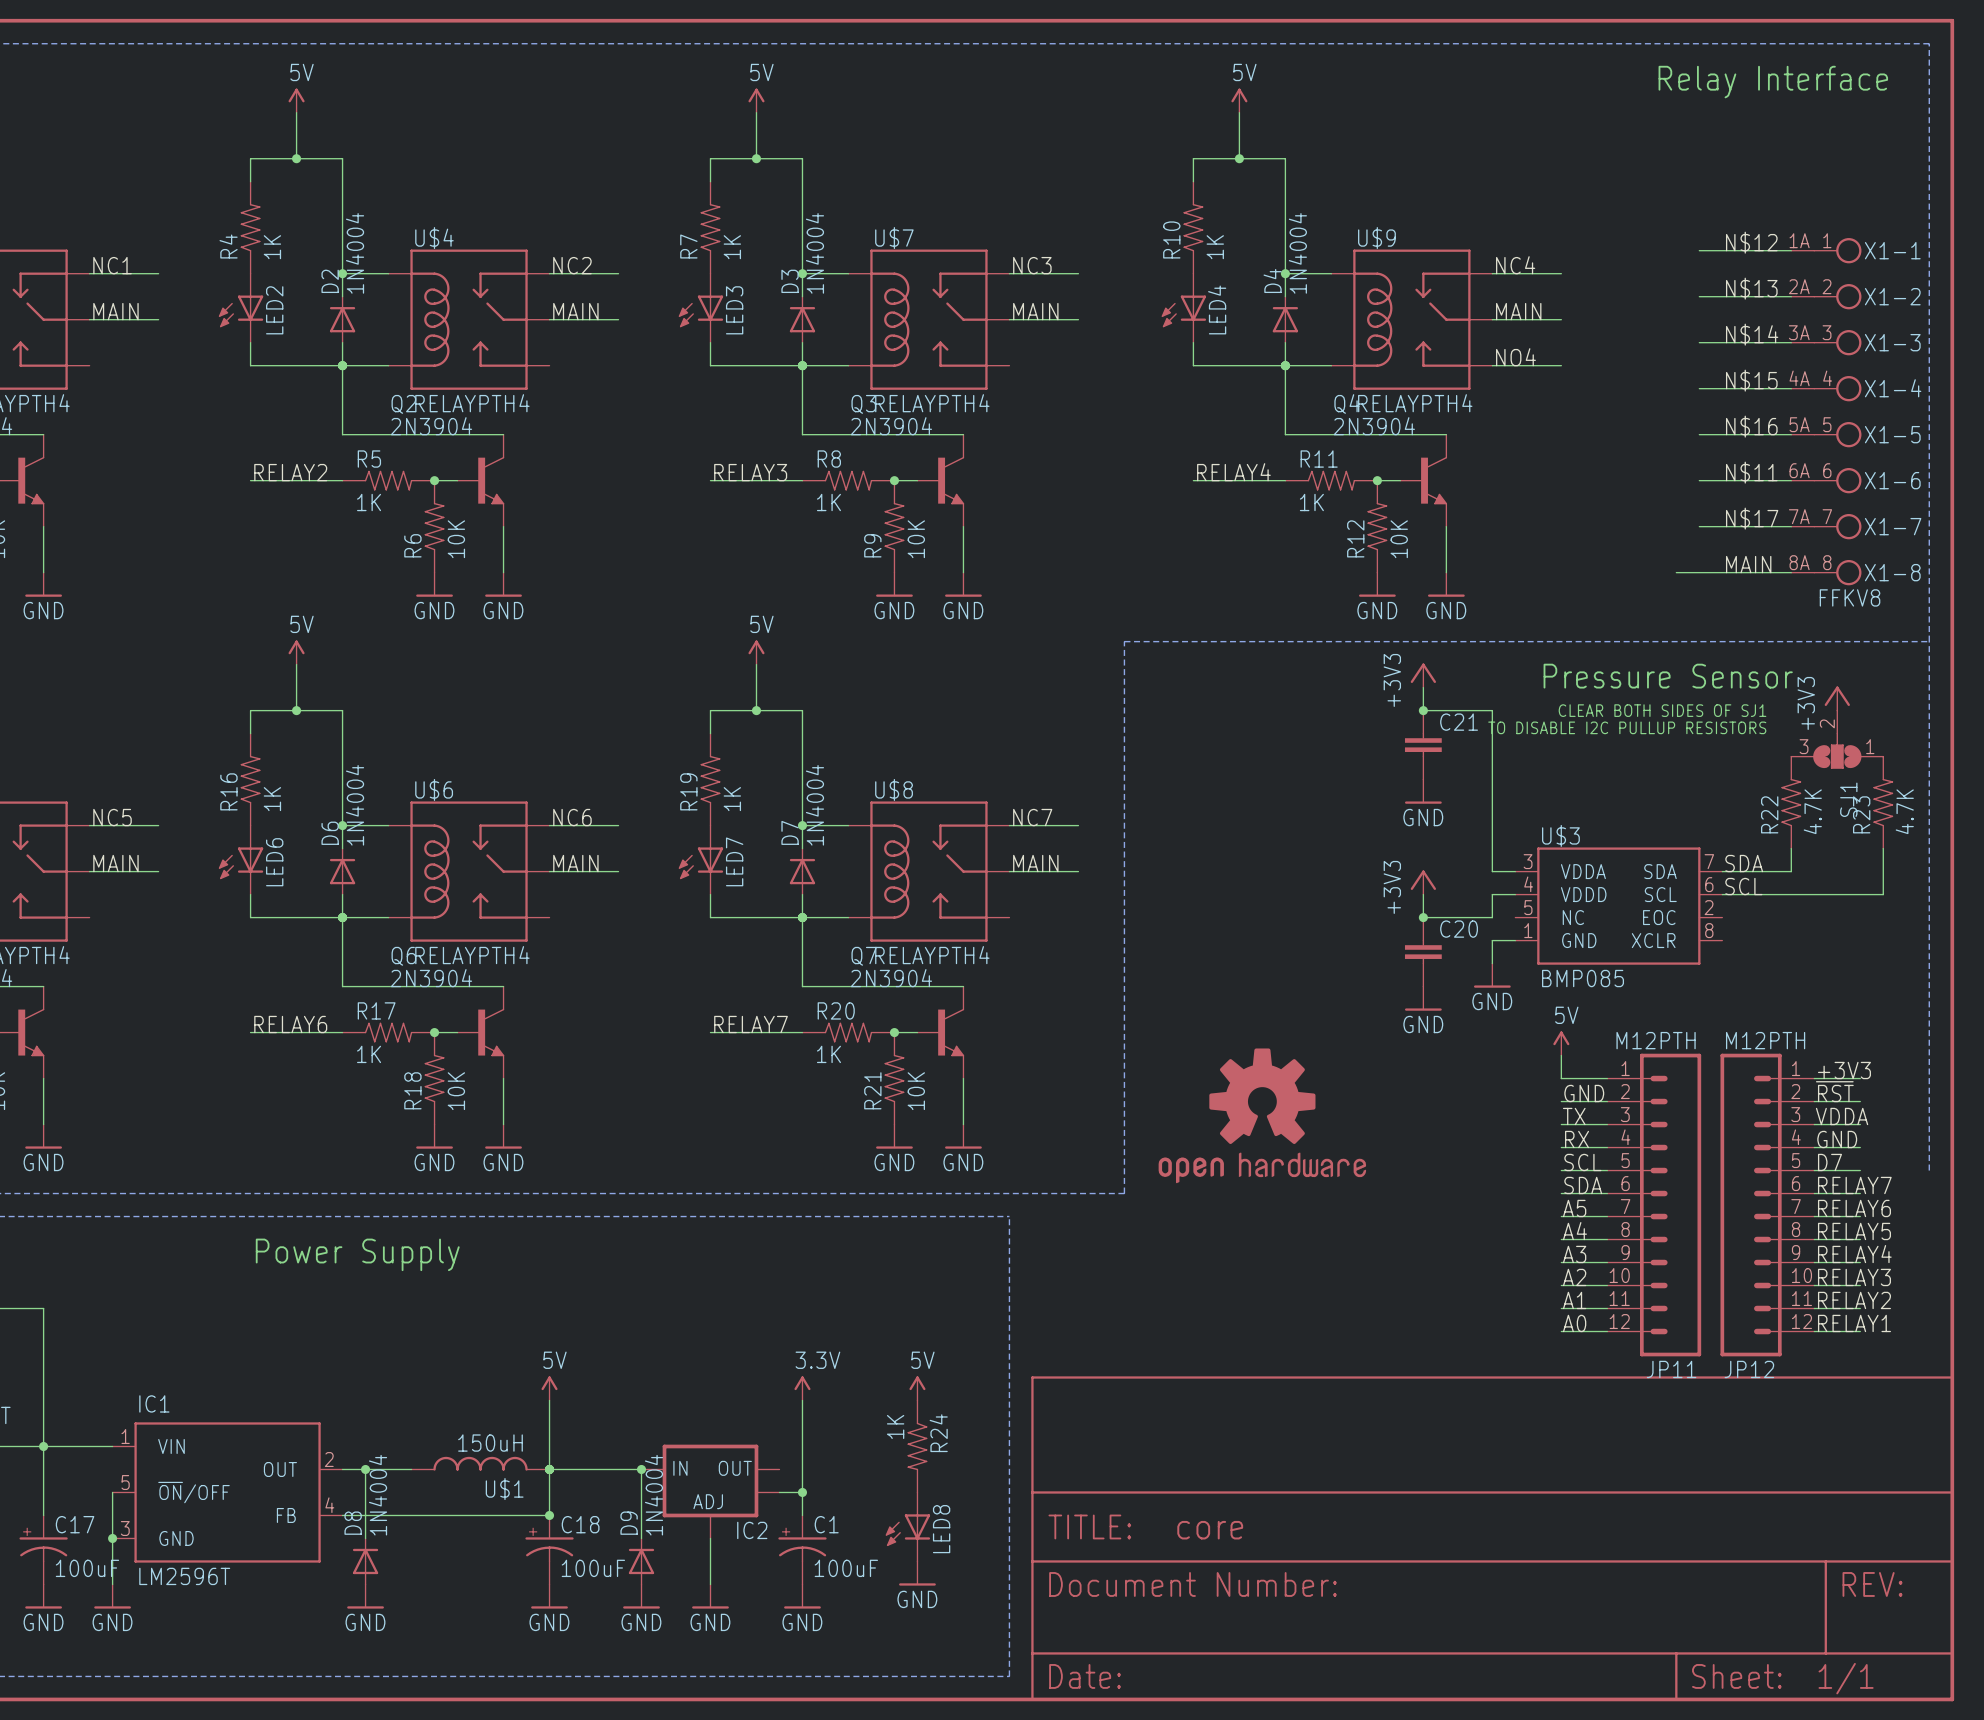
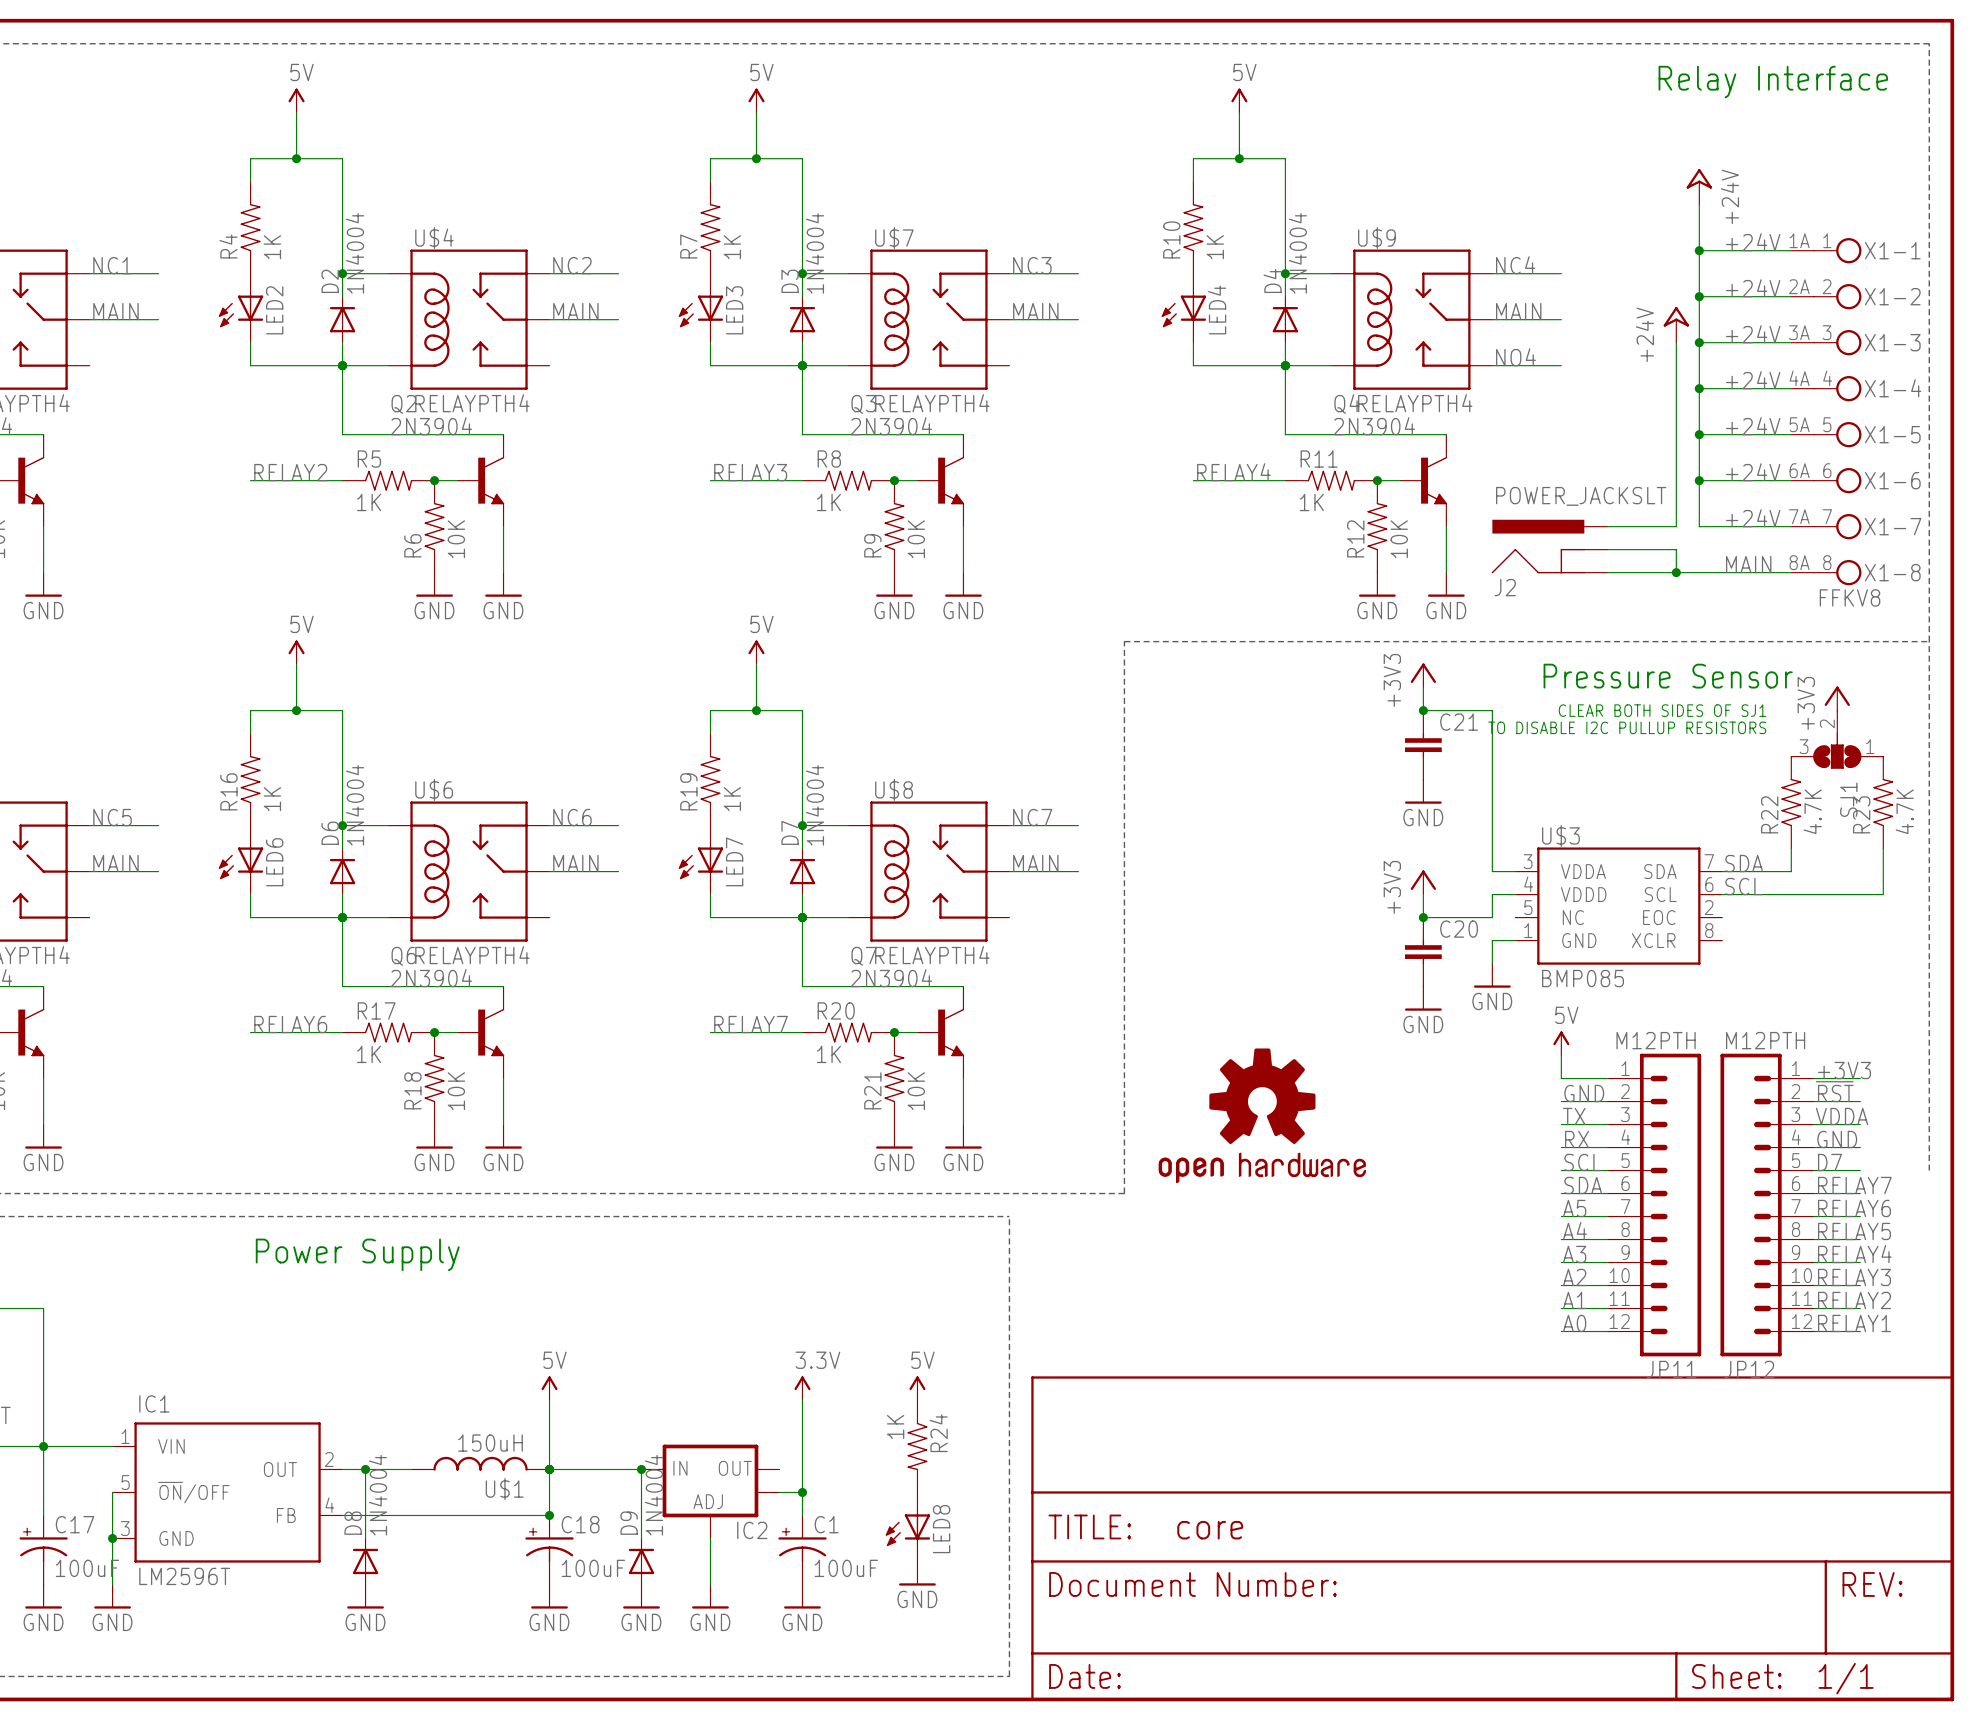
power symbol: none -> +24V (1699, 186)
wire: none -> (1699, 204) (1699, 526)
label: N$12 (1751, 242) -> +24V (1753, 242)
junction: none -> (1699, 250)
label: N$13 (1751, 288) -> +24V (1753, 288)
junction: none -> (1699, 296)
power symbol: none -> +24V (1676, 324)
label: N$14 (1752, 334) -> +24V (1753, 334)
wire: none -> (1676, 342) (1676, 526) (1607, 526)
junction: none -> (1699, 342)
label: N$15 (1751, 380) -> +24V (1753, 380)
junction: none -> (1699, 388)
label: N$16 (1751, 426) -> +24V (1753, 426)
junction: none -> (1699, 434)
label: N$11 (1751, 472) -> +24V (1753, 472)
junction: none -> (1699, 480)
label: N$17 (1752, 518) -> +24V (1753, 518)
J2: none -> POWER_JACKSLT (1549, 546)
wire: none -> (1607, 549) (1676, 549) (1676, 572) (1607, 572)
junction: none -> (1676, 572)

